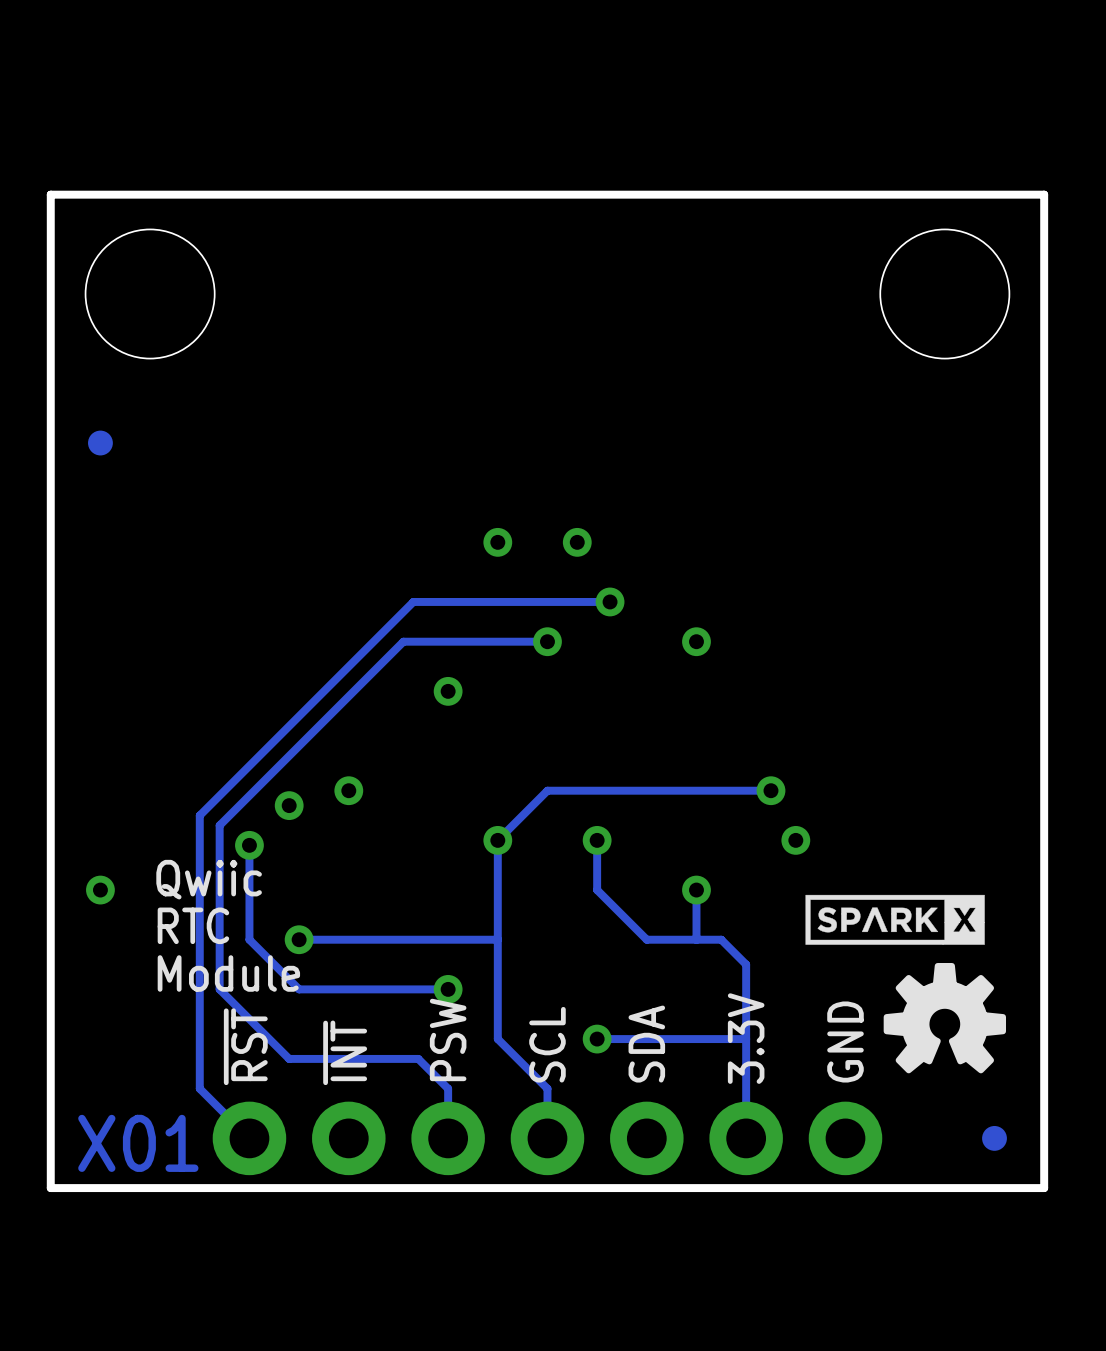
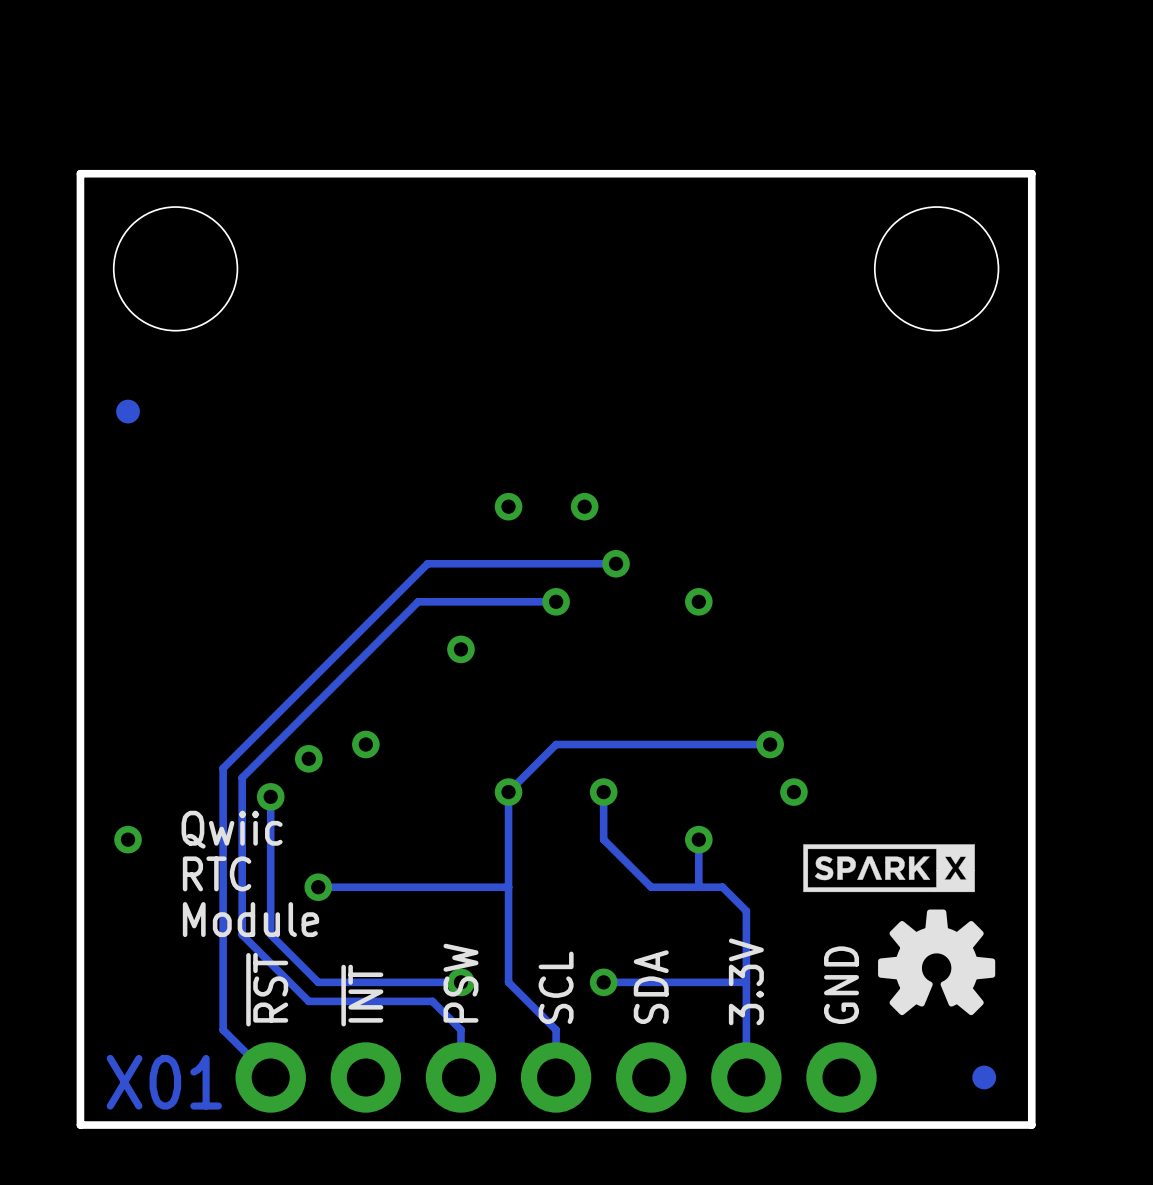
track: (249, 939) (299, 989) (448, 989) -> (270, 887) (270, 934) (318, 982) (460, 982)
via position: (448, 989) -> (460, 982)

